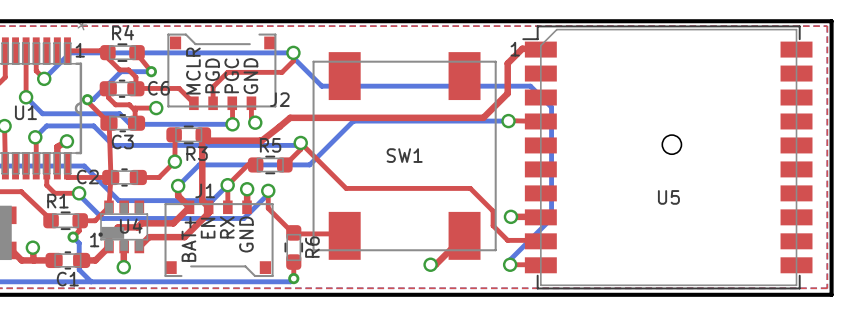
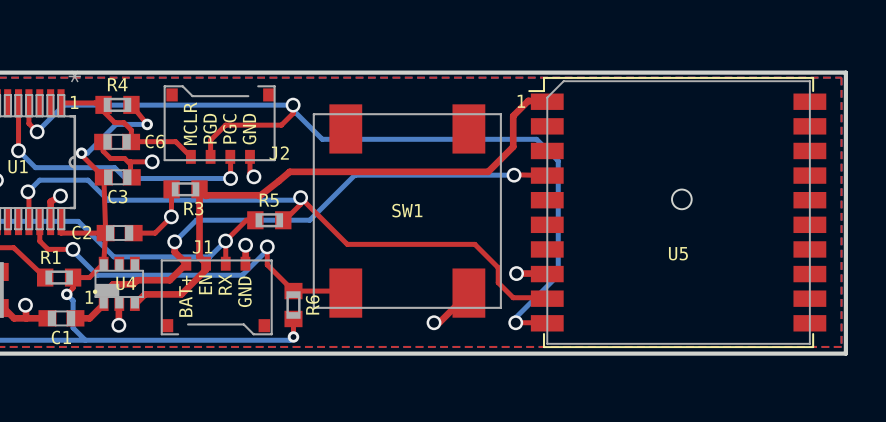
R4 footprint: [100, 43, 145, 62] -> [95, 95, 140, 114]
C6 footprint: [99, 79, 145, 98] -> [94, 133, 141, 151]
C3 footprint: [100, 114, 146, 133] -> [94, 169, 141, 186]
R3 footprint: [166, 125, 212, 145] -> [163, 180, 208, 199]
R5 footprint: [247, 155, 293, 175] -> [247, 211, 292, 230]
C2 footprint: [102, 168, 147, 187] -> [96, 224, 143, 242]
R1 footprint: [43, 211, 89, 231] -> [36, 268, 82, 287]
R6 footprint: [284, 225, 304, 270] -> [284, 282, 303, 328]
C1 footprint: [45, 251, 91, 270] -> [38, 310, 85, 327]

